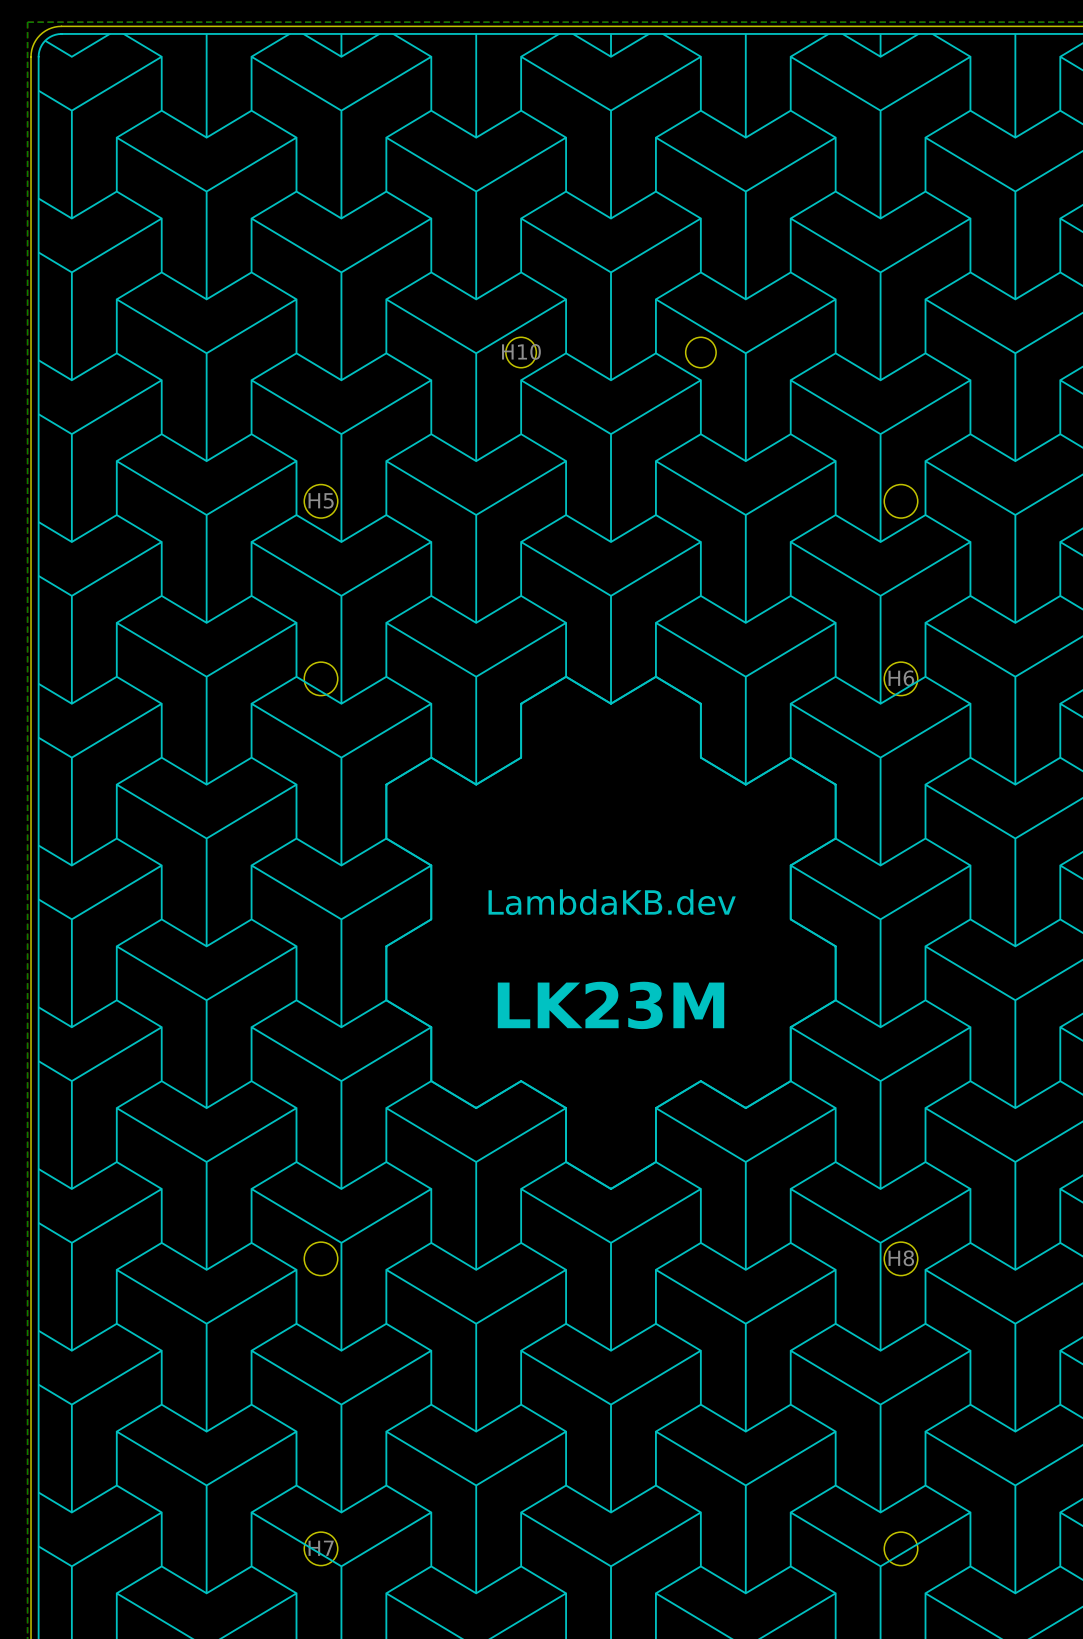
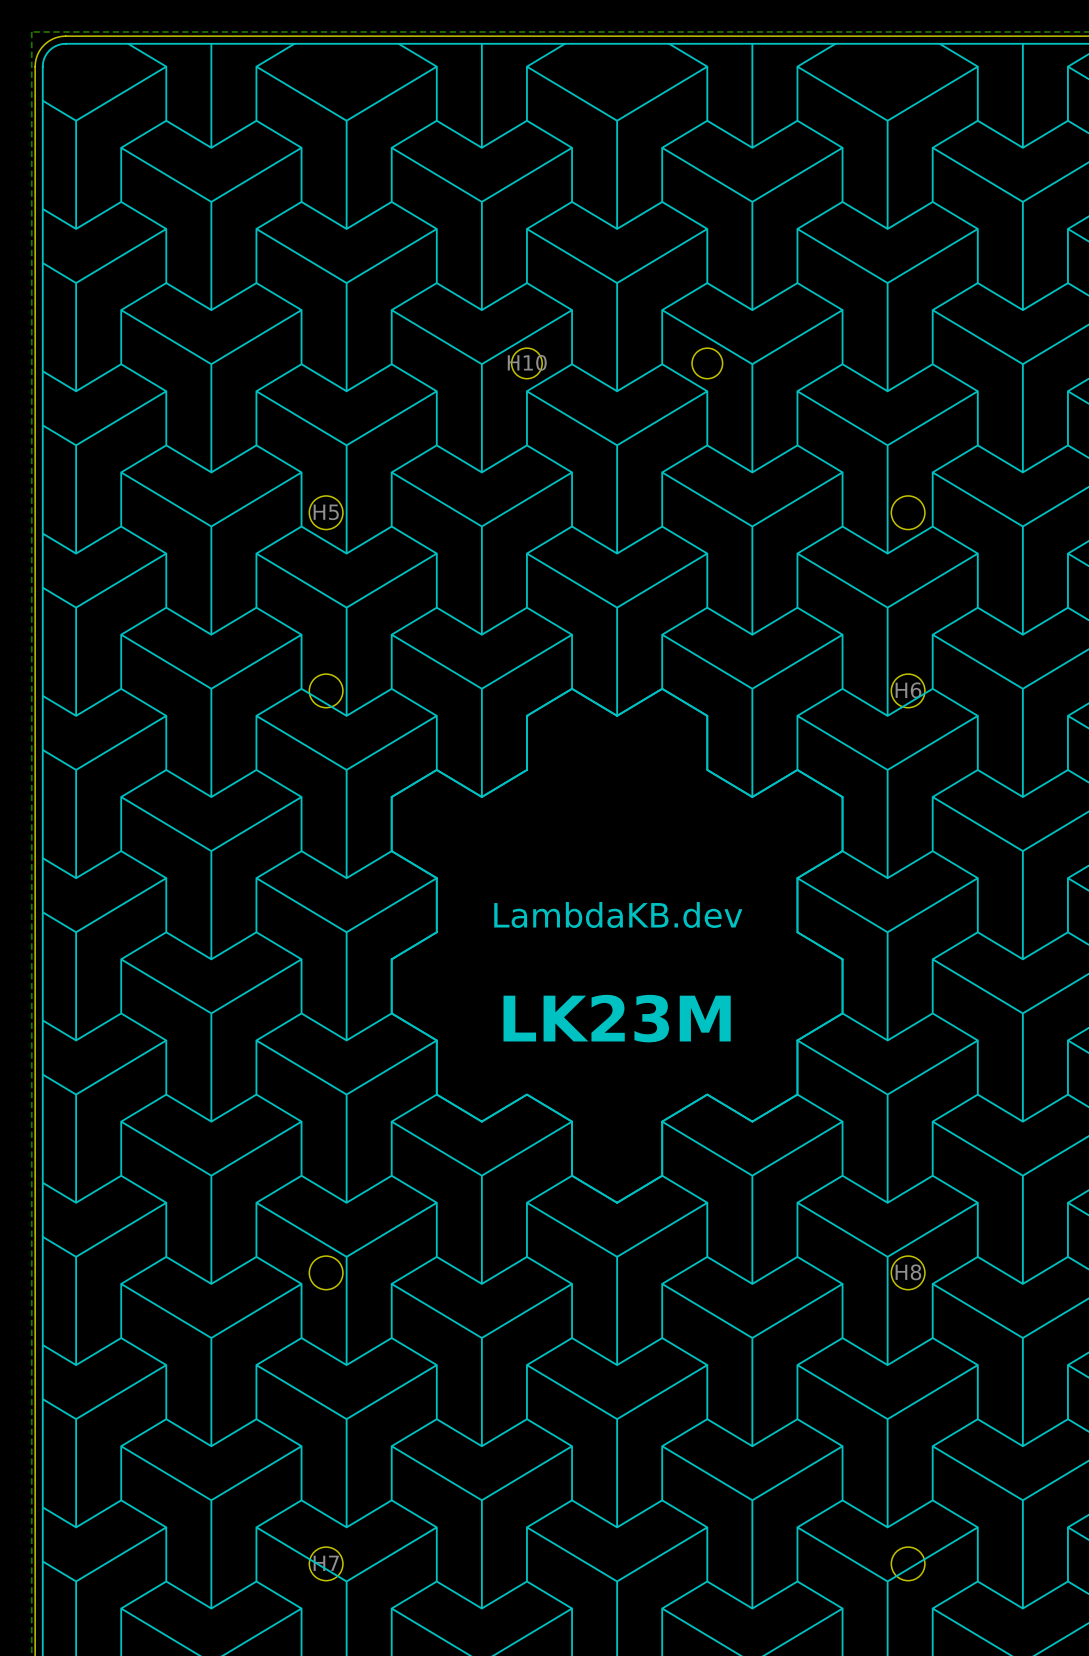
drawing: [44, 33, 112, 58] -> none
drawing: [301, 33, 382, 58] -> none
drawing: [571, 33, 651, 58] -> none
drawing: [840, 33, 921, 58] -> none

